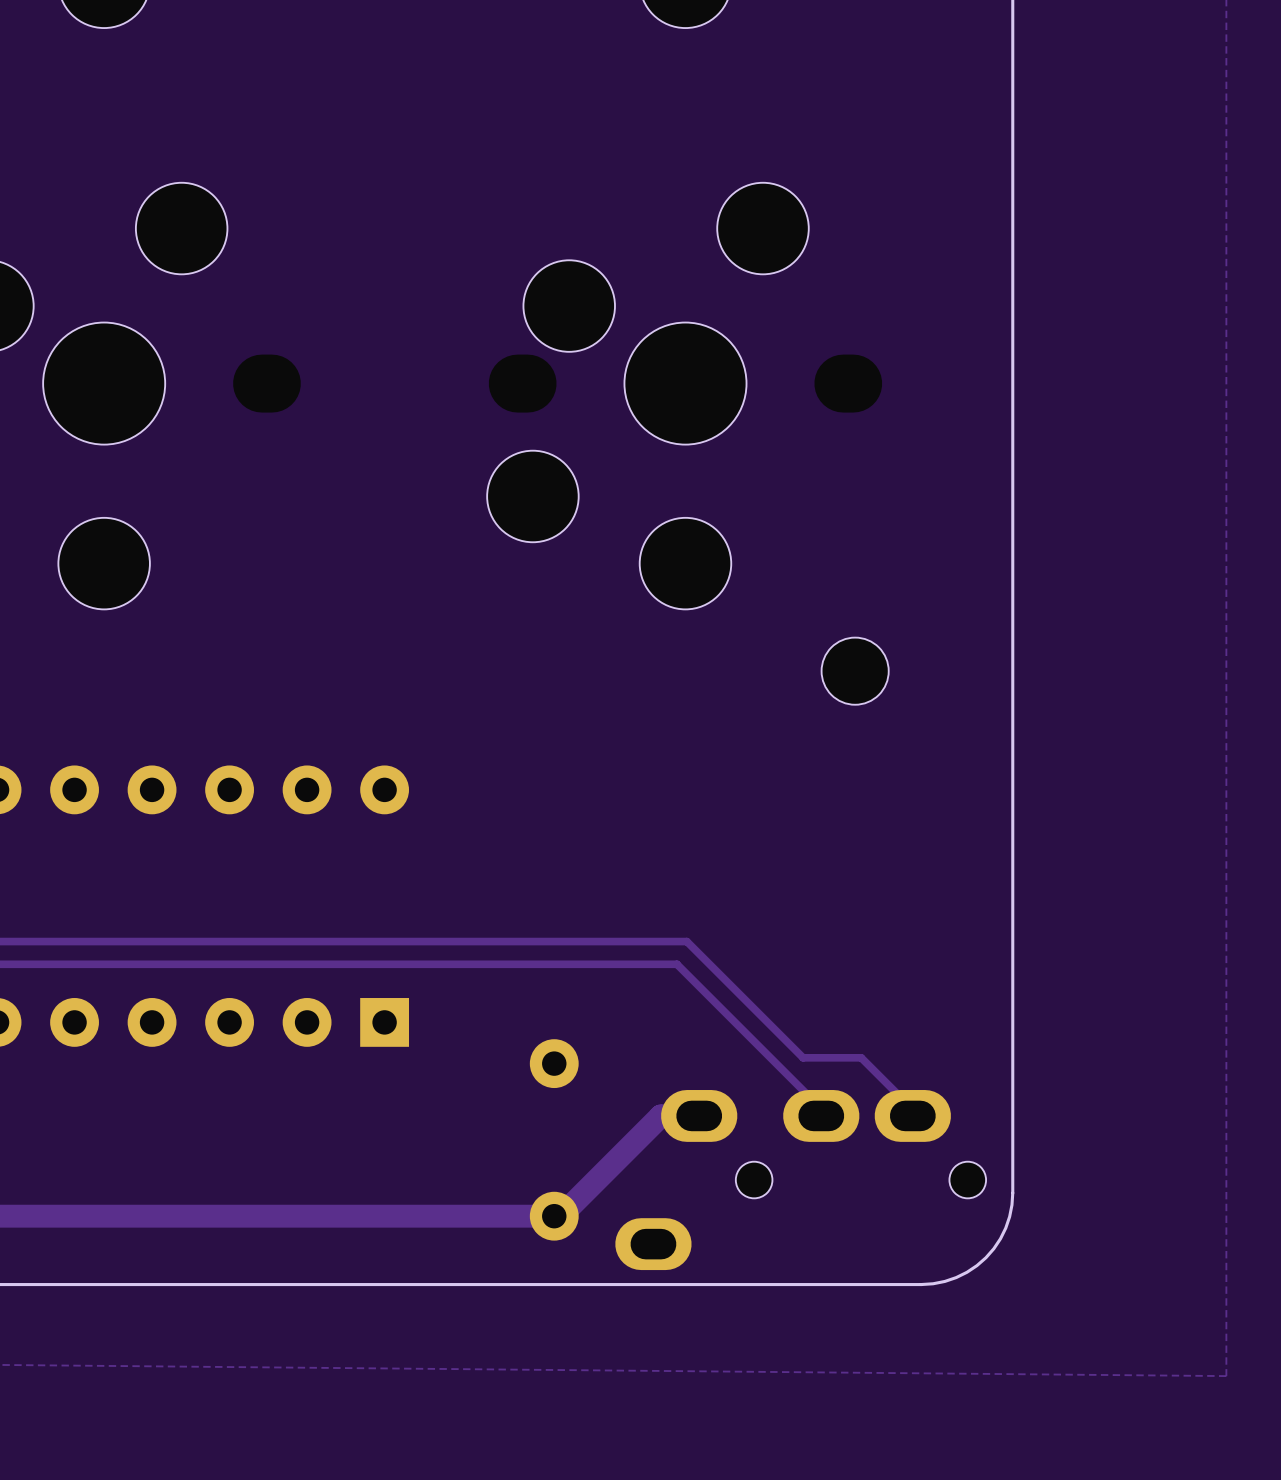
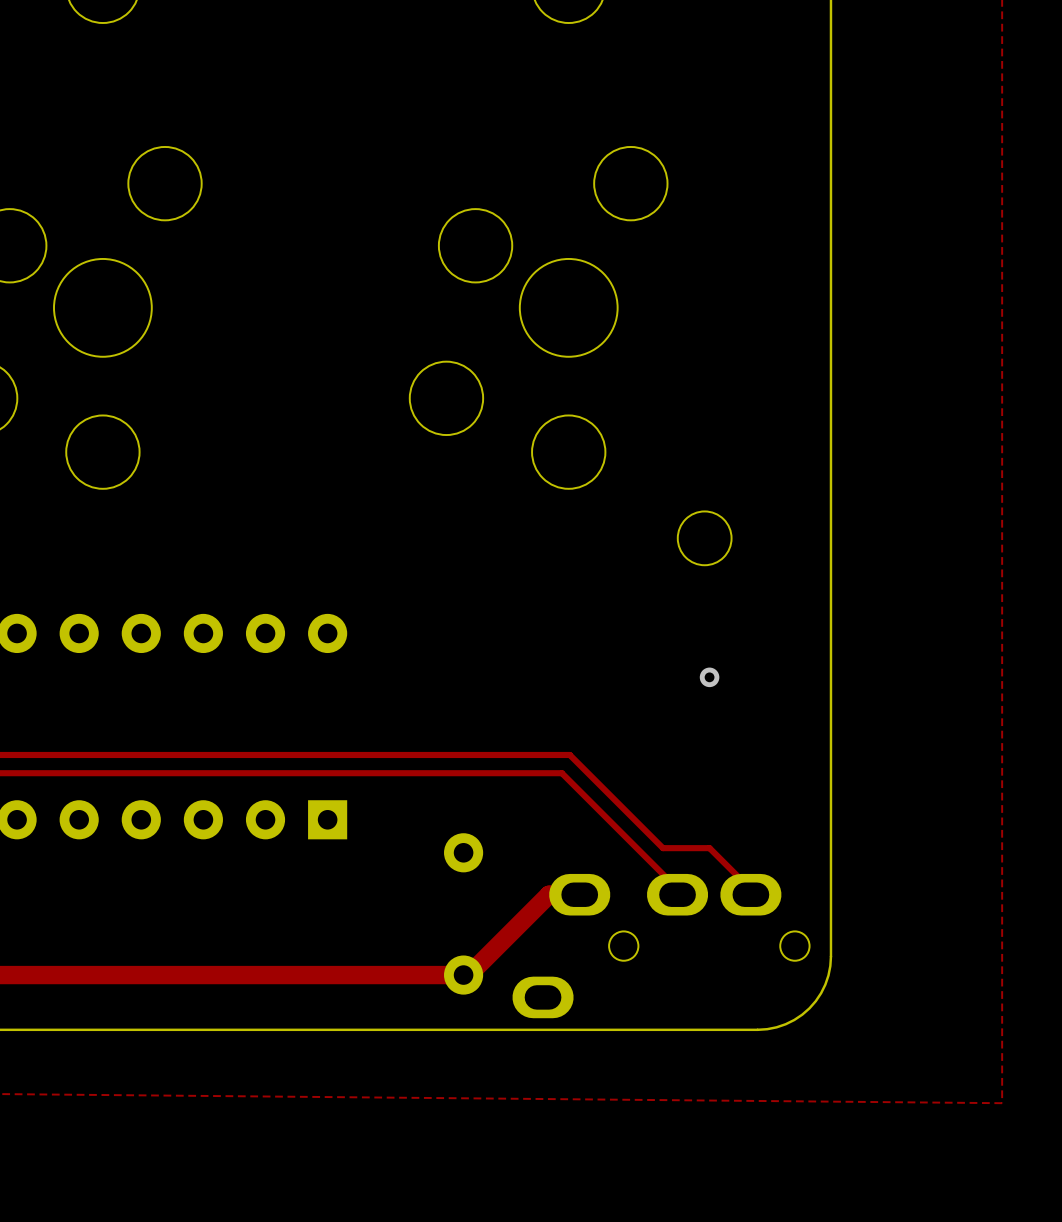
via: none -> (709, 677)

